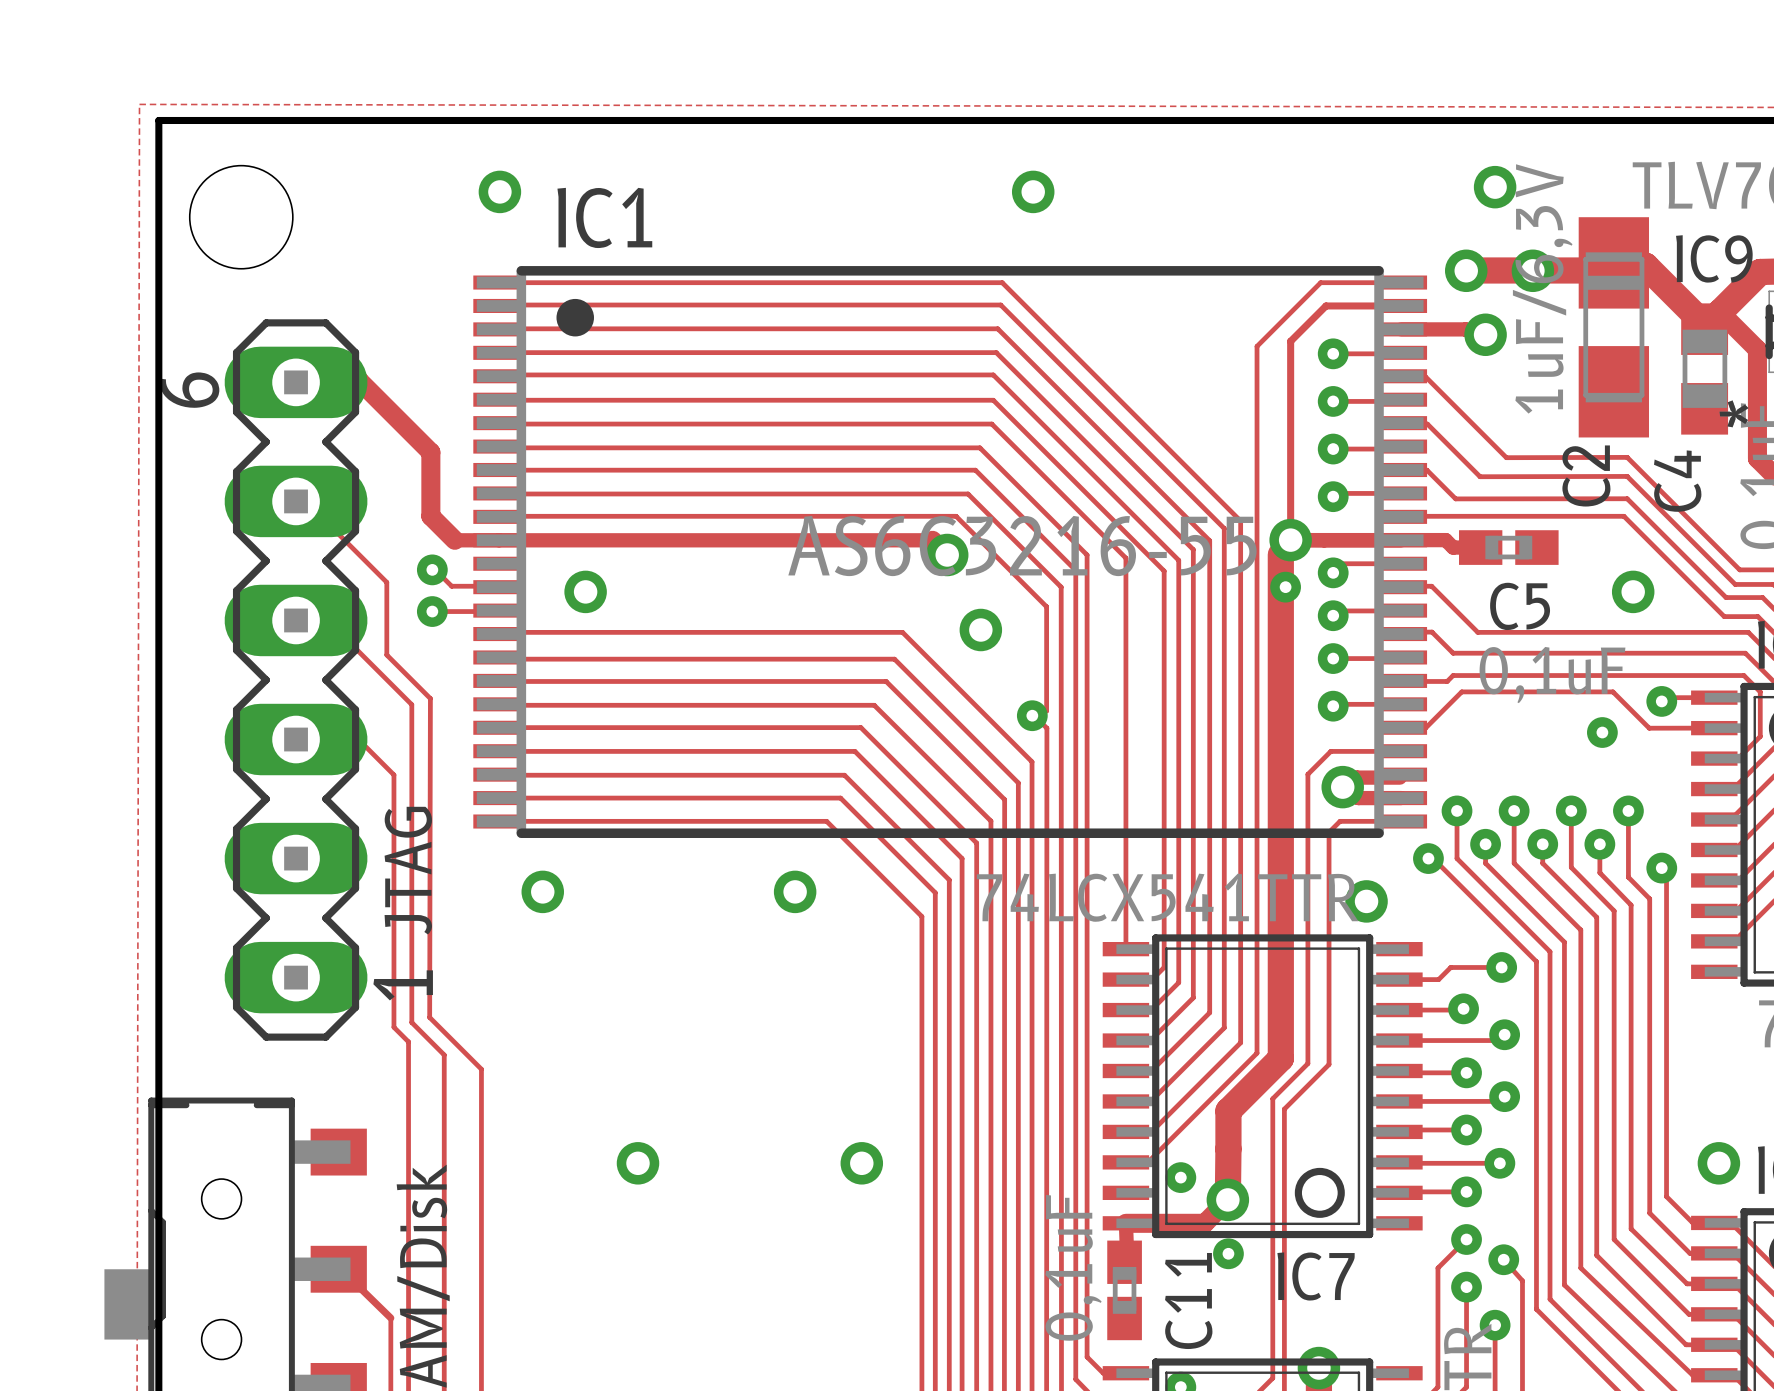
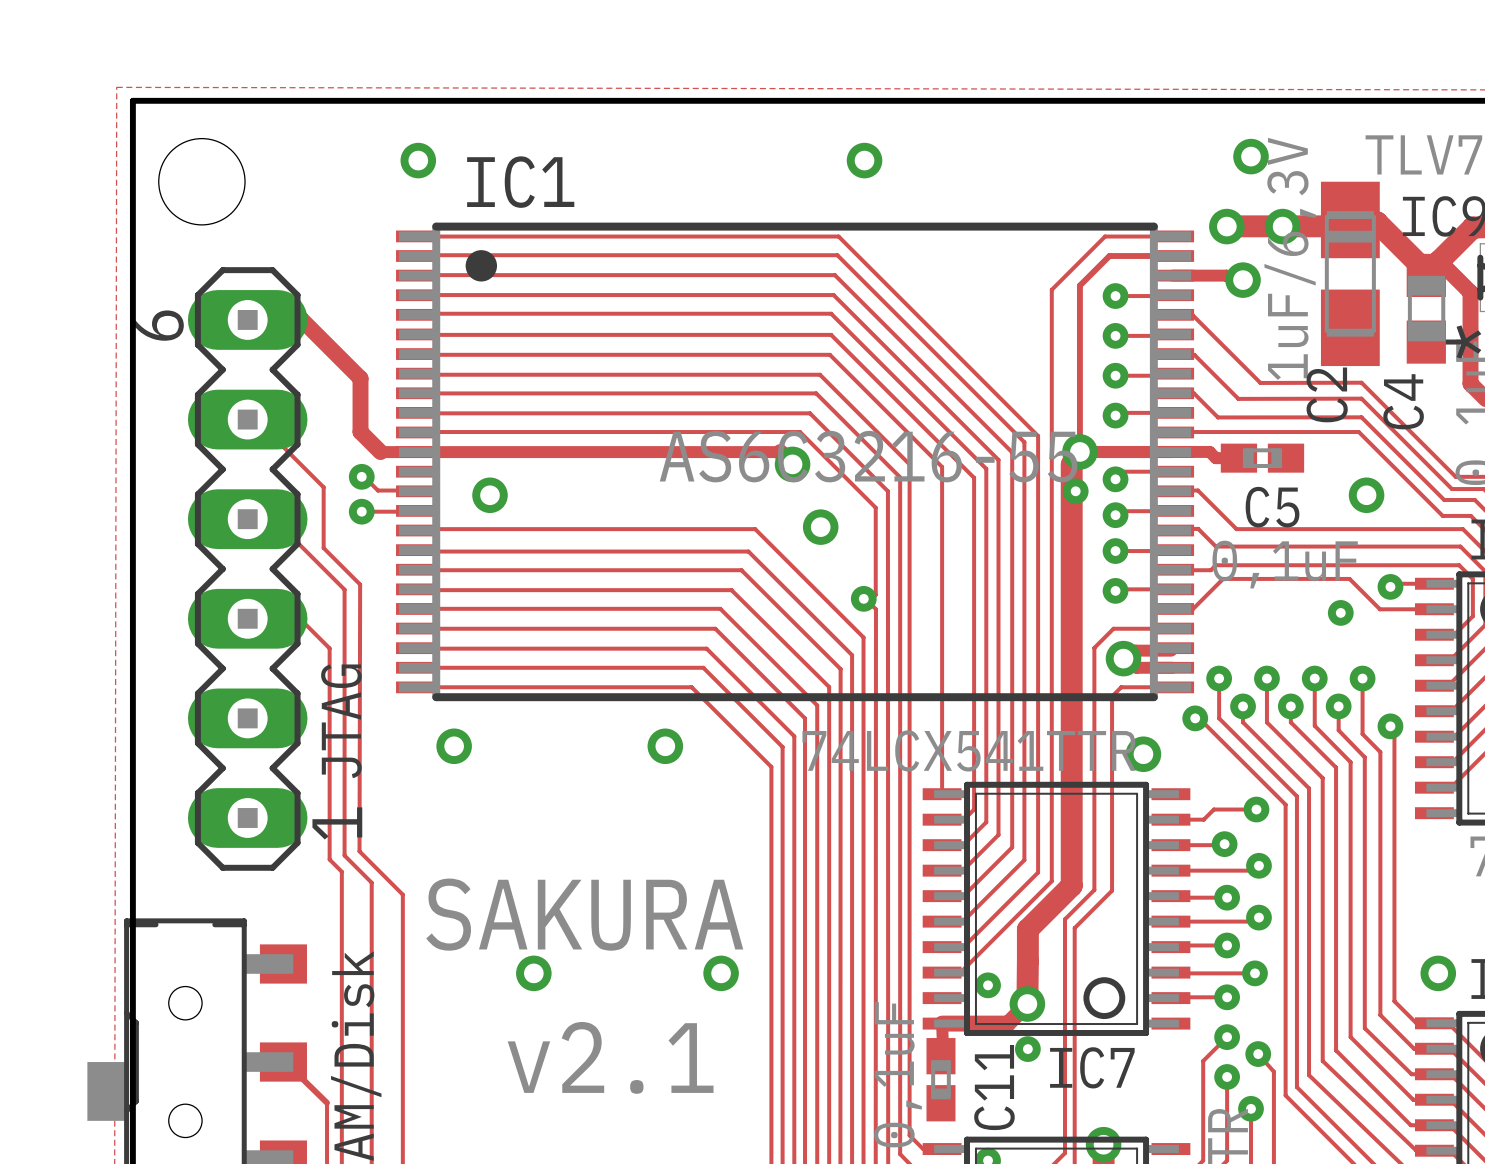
text: none -> SAKURA (584, 914)
text: none -> v2.1 (610, 1057)

